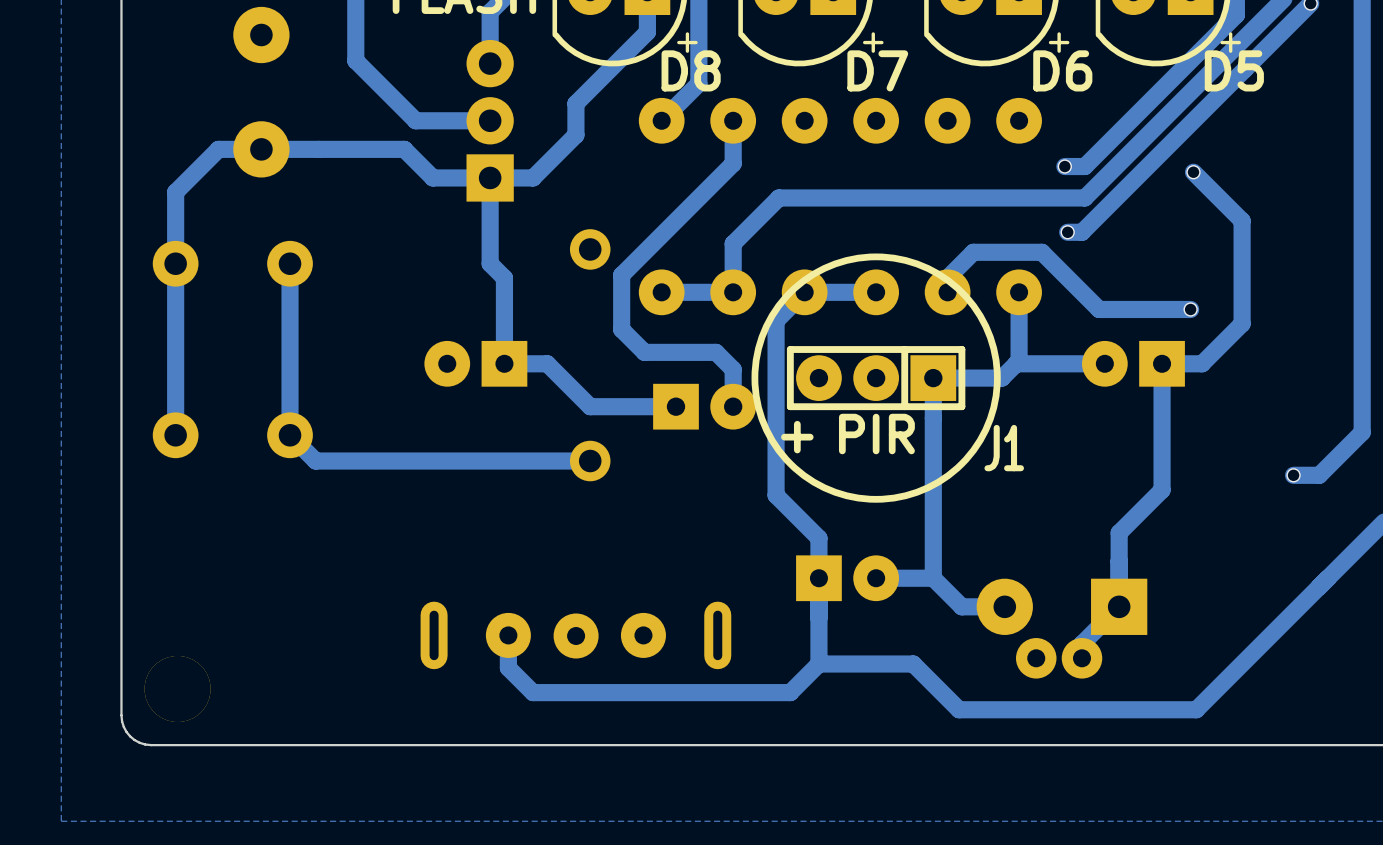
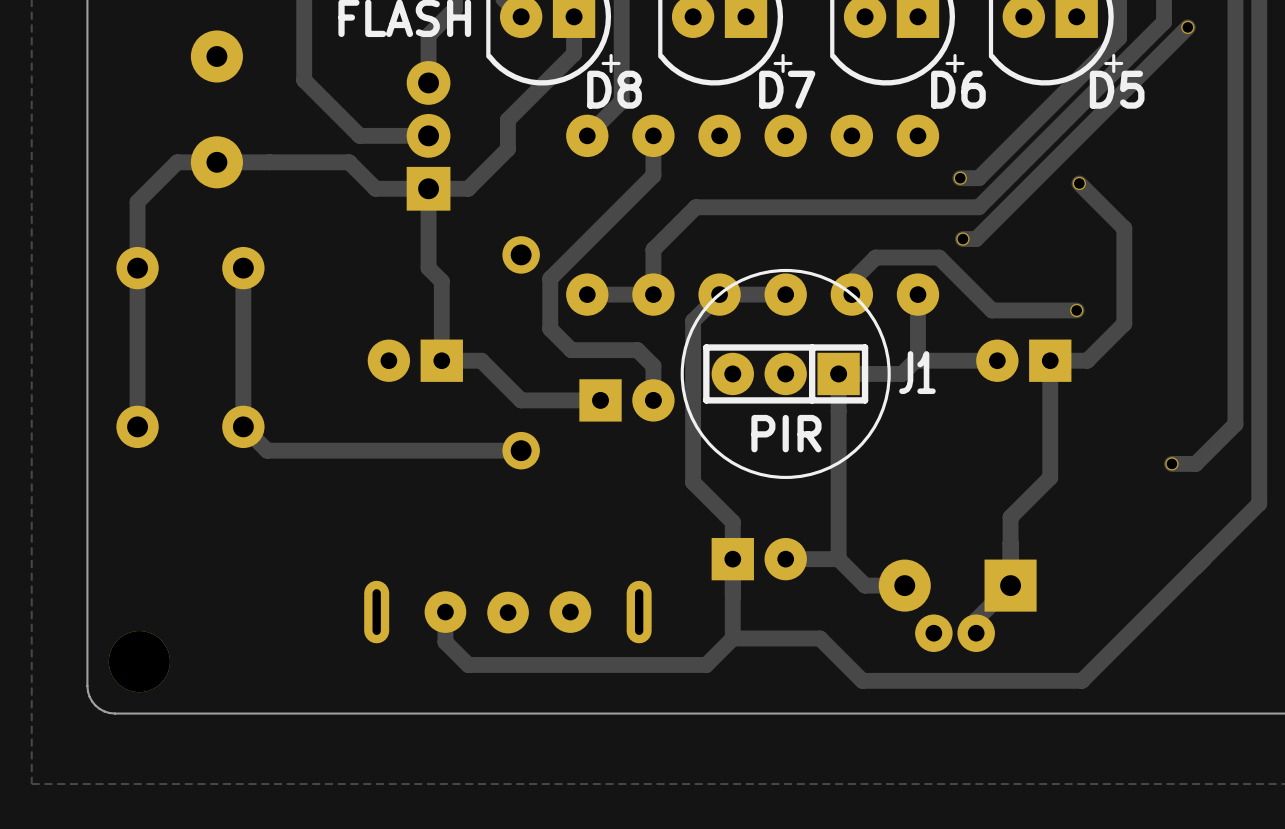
J1 footprint: [751, 253, 1001, 503] -> [703, 344, 869, 404]
drawing: none -> [680, 268, 891, 480]
J1 value: PIR (876, 434) -> none
text: none -> PIR (786, 433)
J1 name position: J1 (1004, 448) -> J1 (917, 372)

